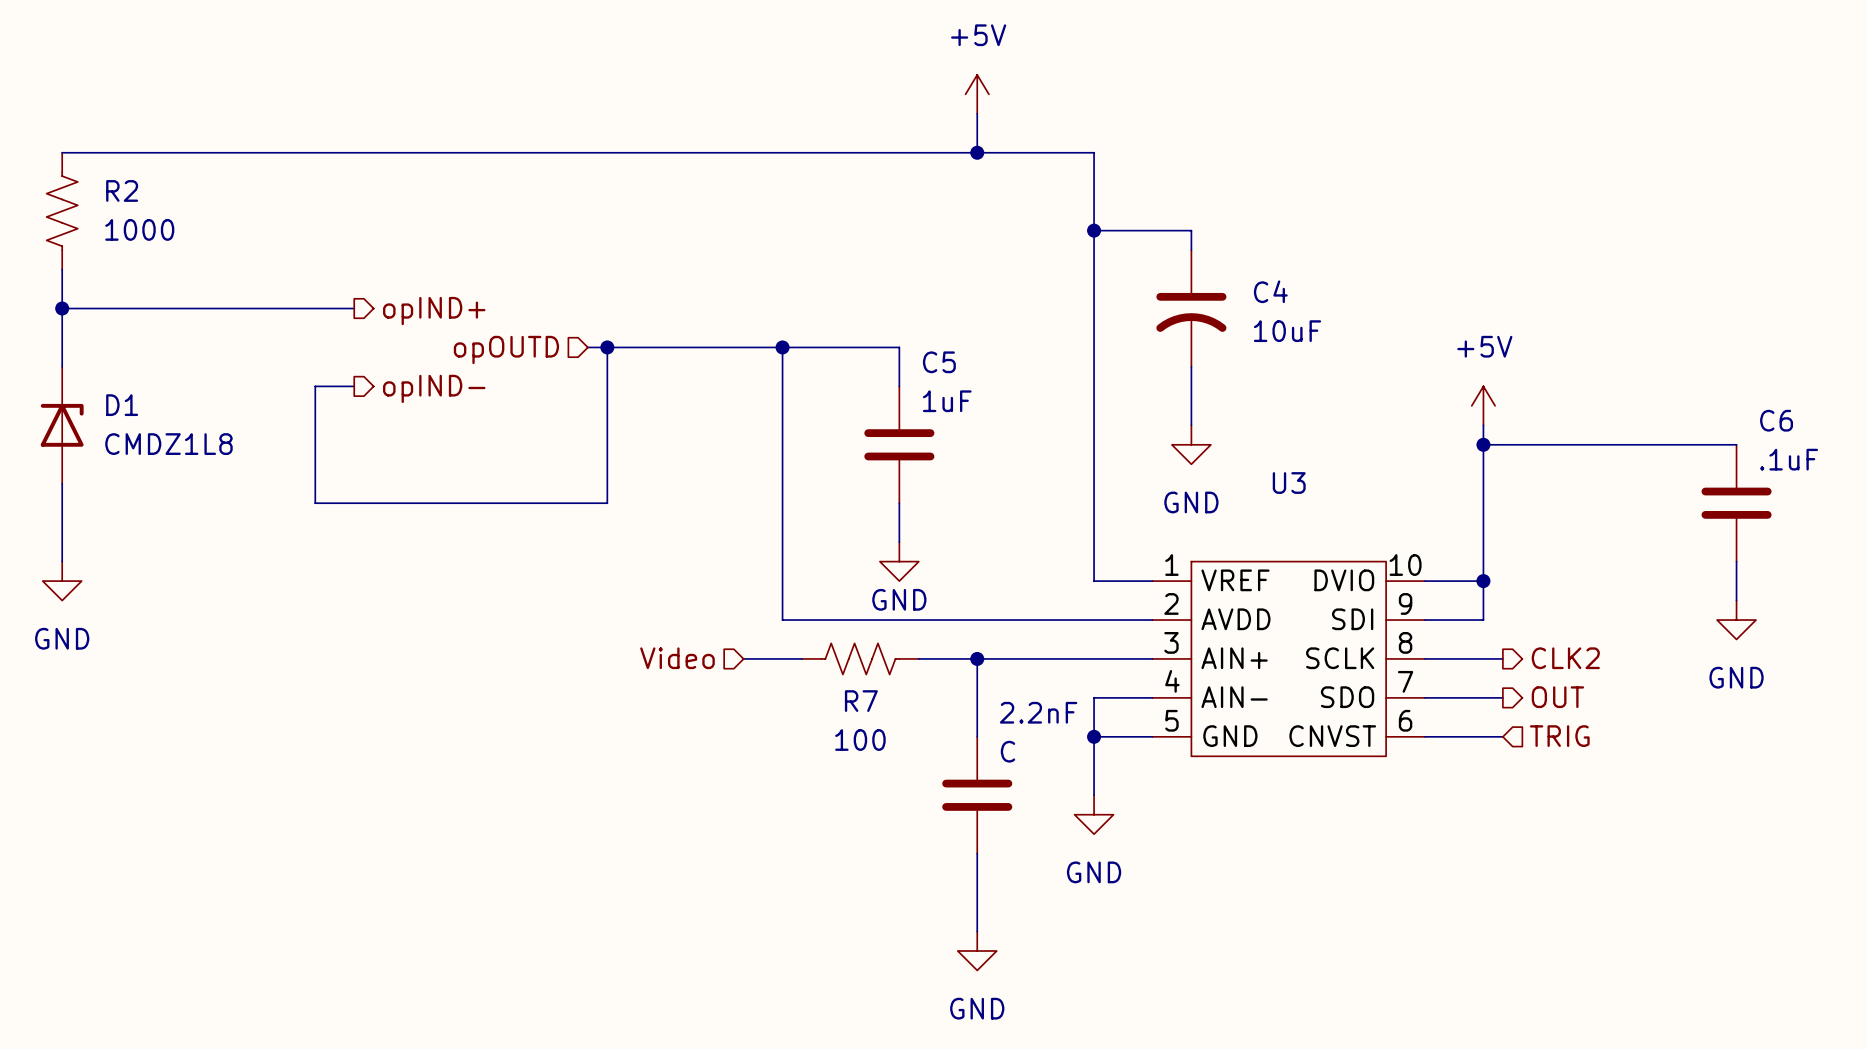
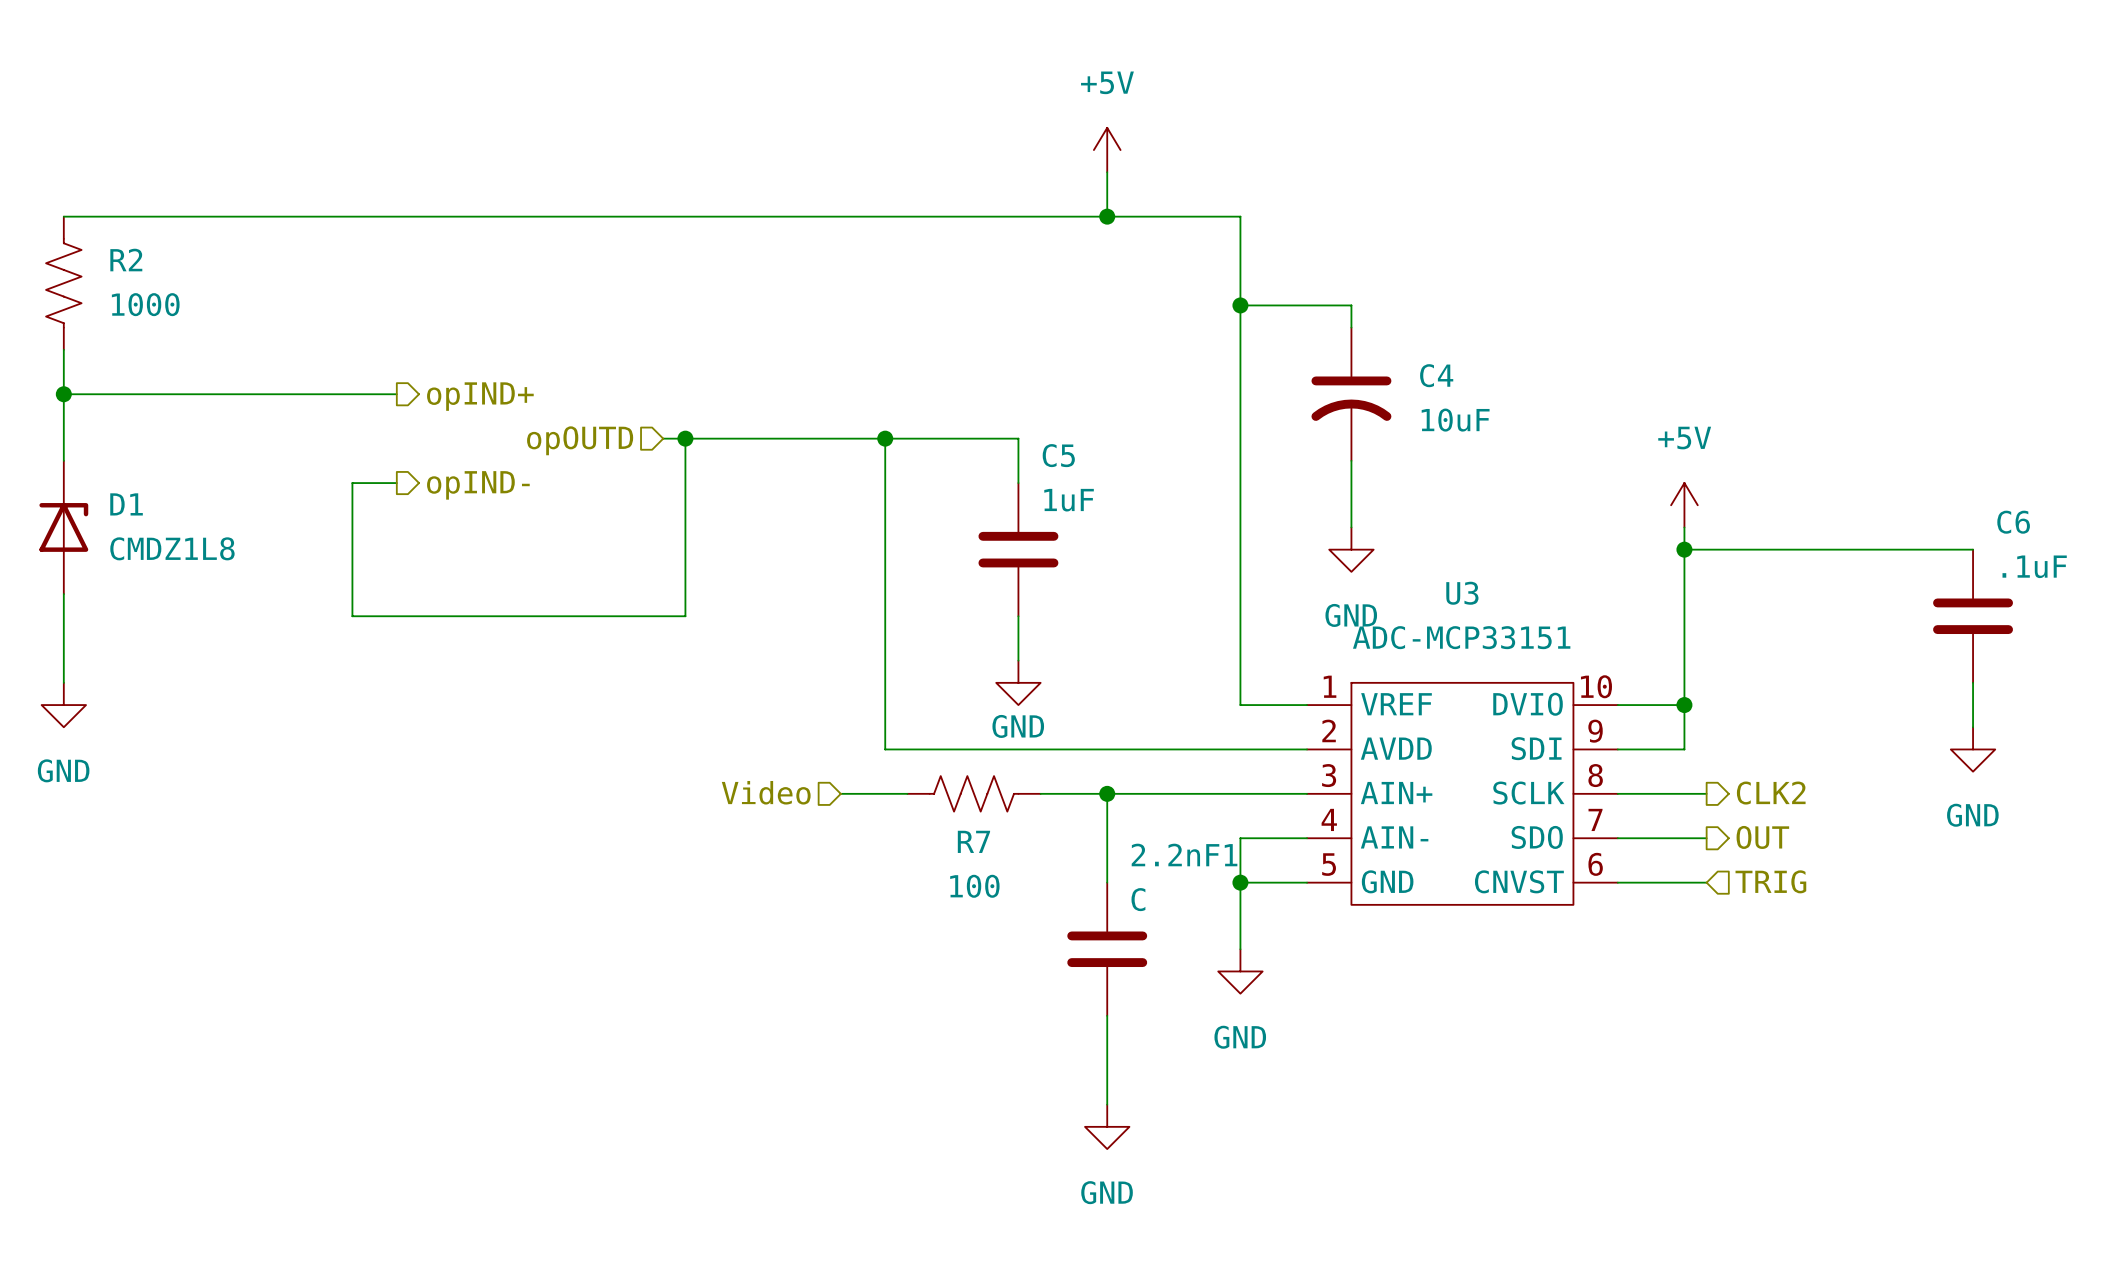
U3 value: none -> ADC-MCP33151 (1461, 637)
2.2nF name: 2.2nF (1038, 712) -> 2.2nF1 (1184, 854)

